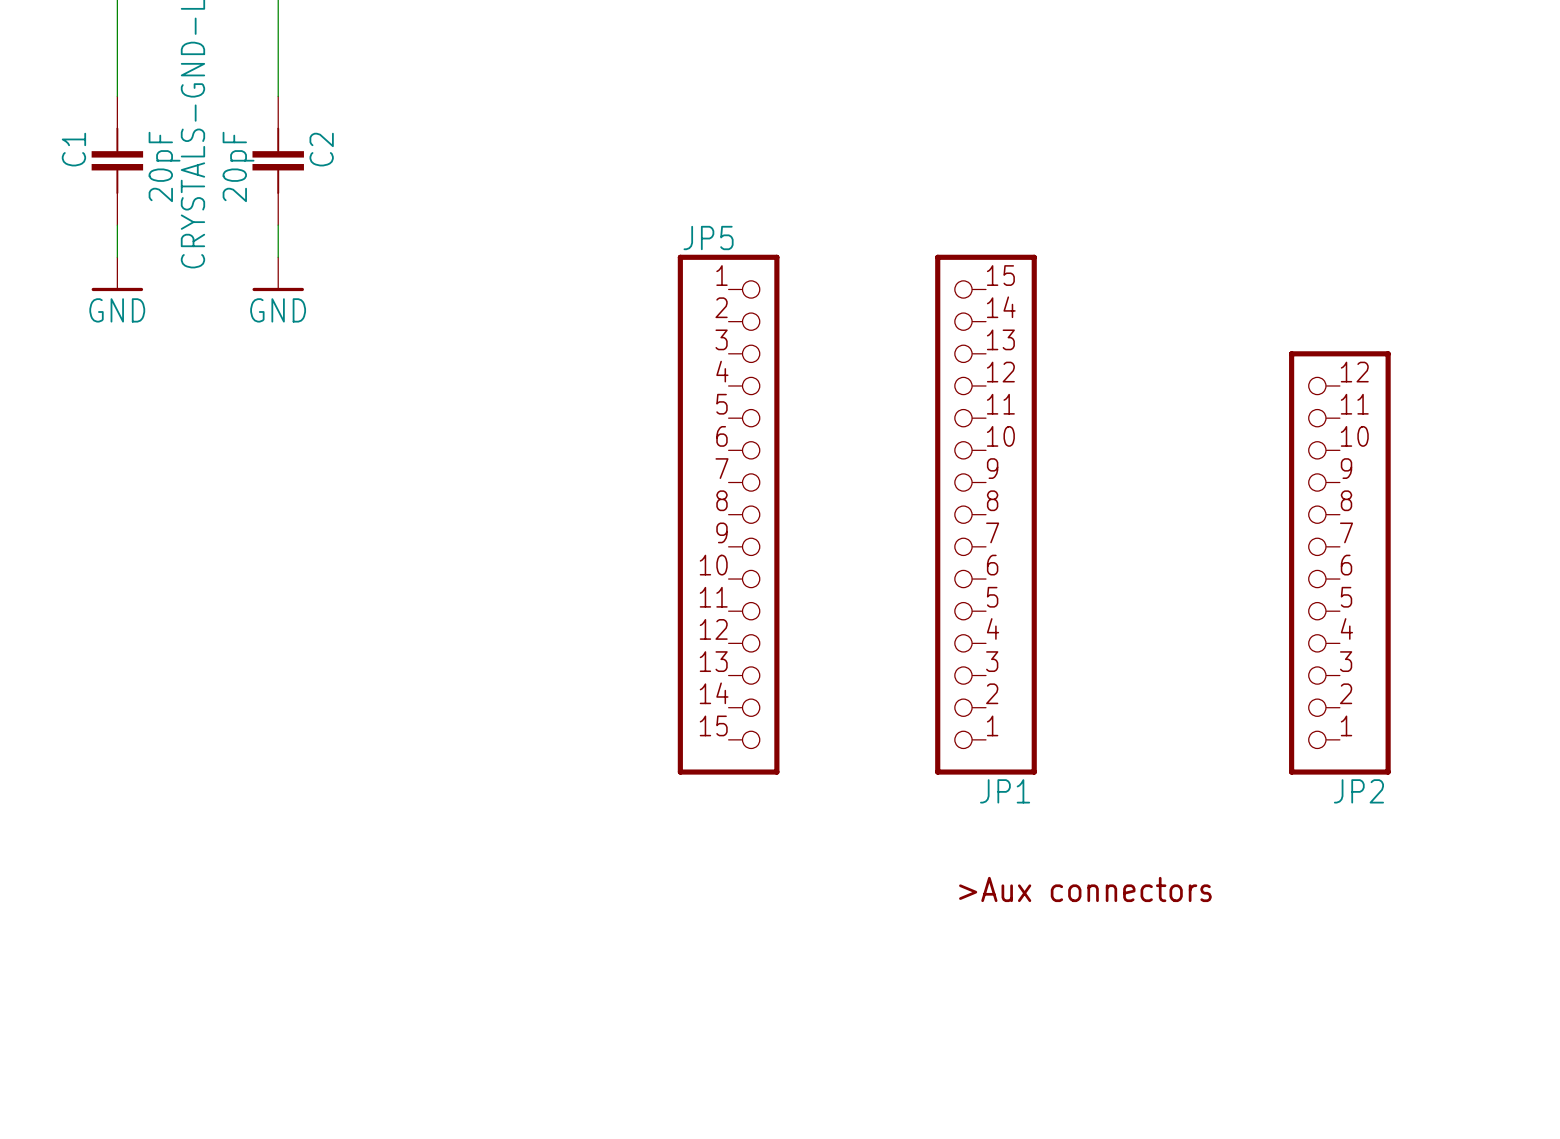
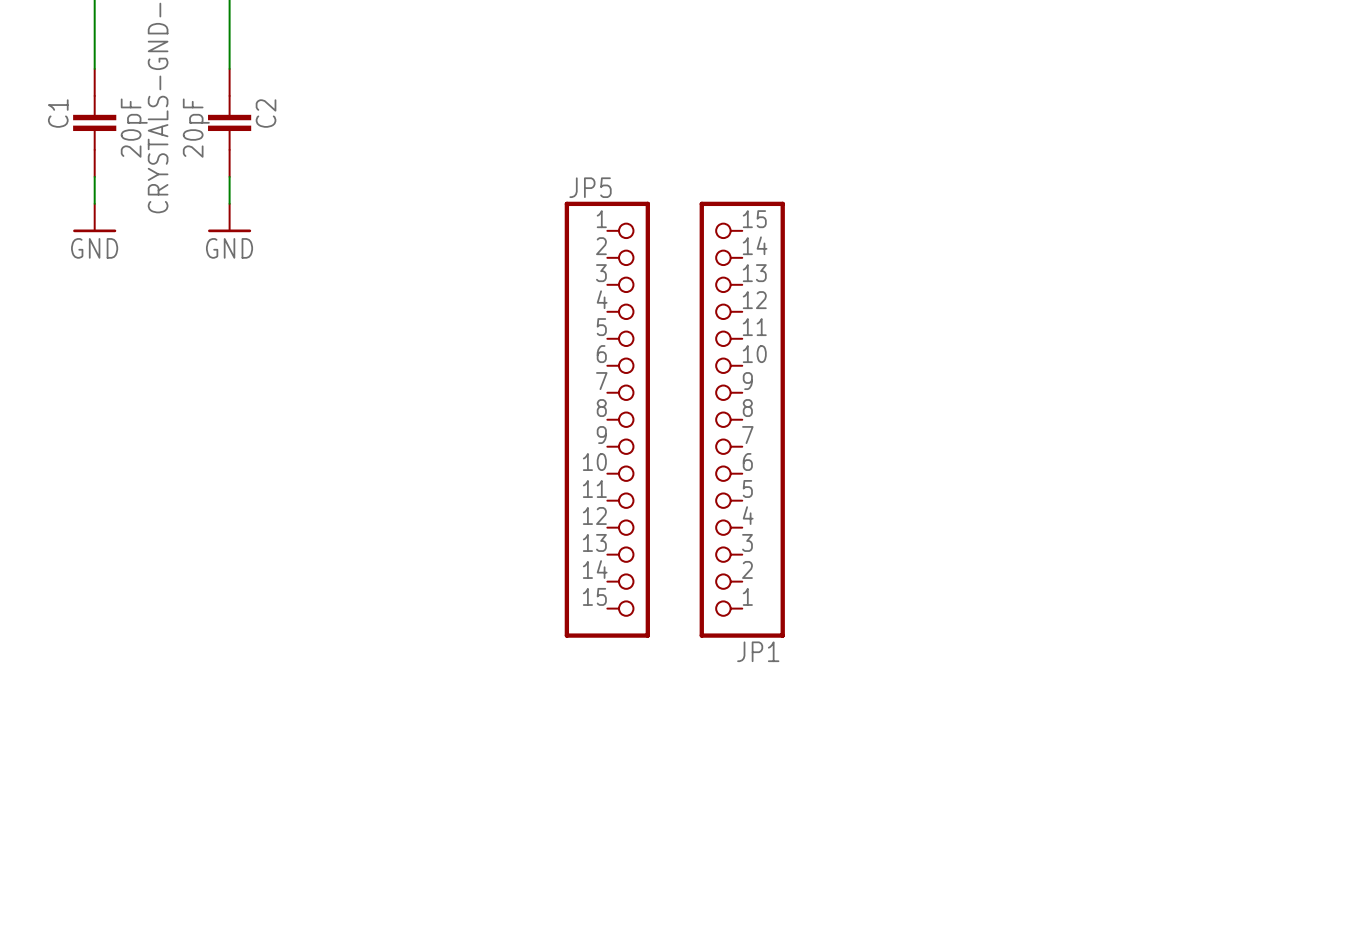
JP1 position: (985, 514) -> (742, 419)
JP2: (1339, 562) -> none
text: >Aux connectors (1085, 889) -> none

